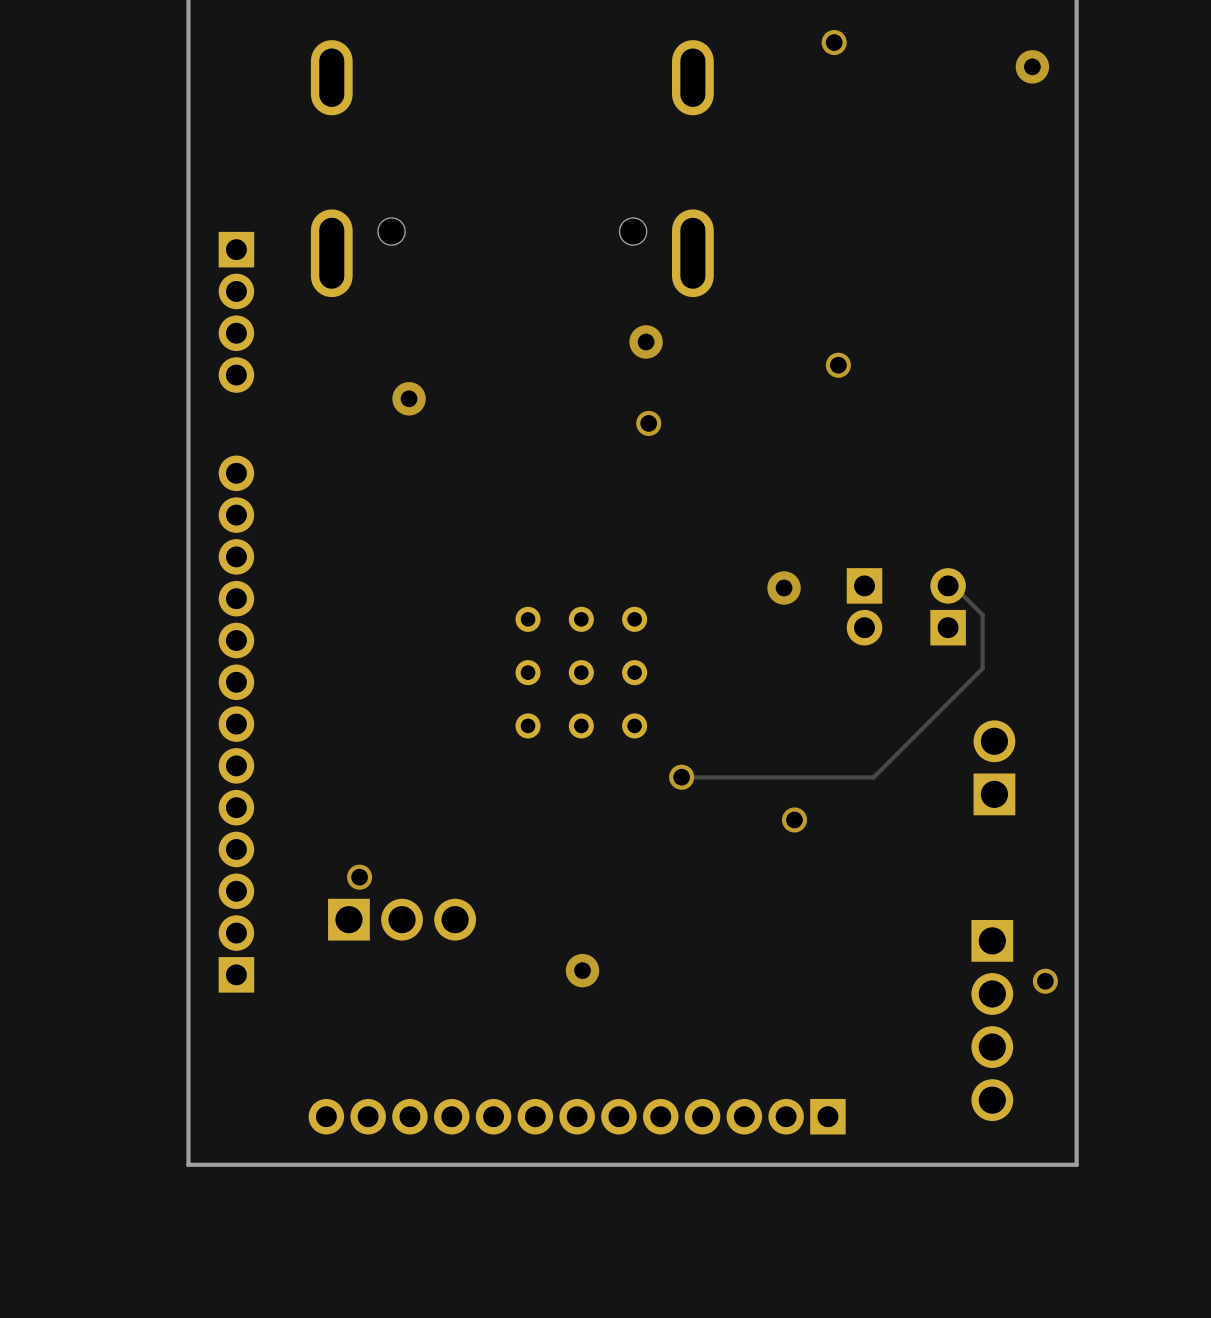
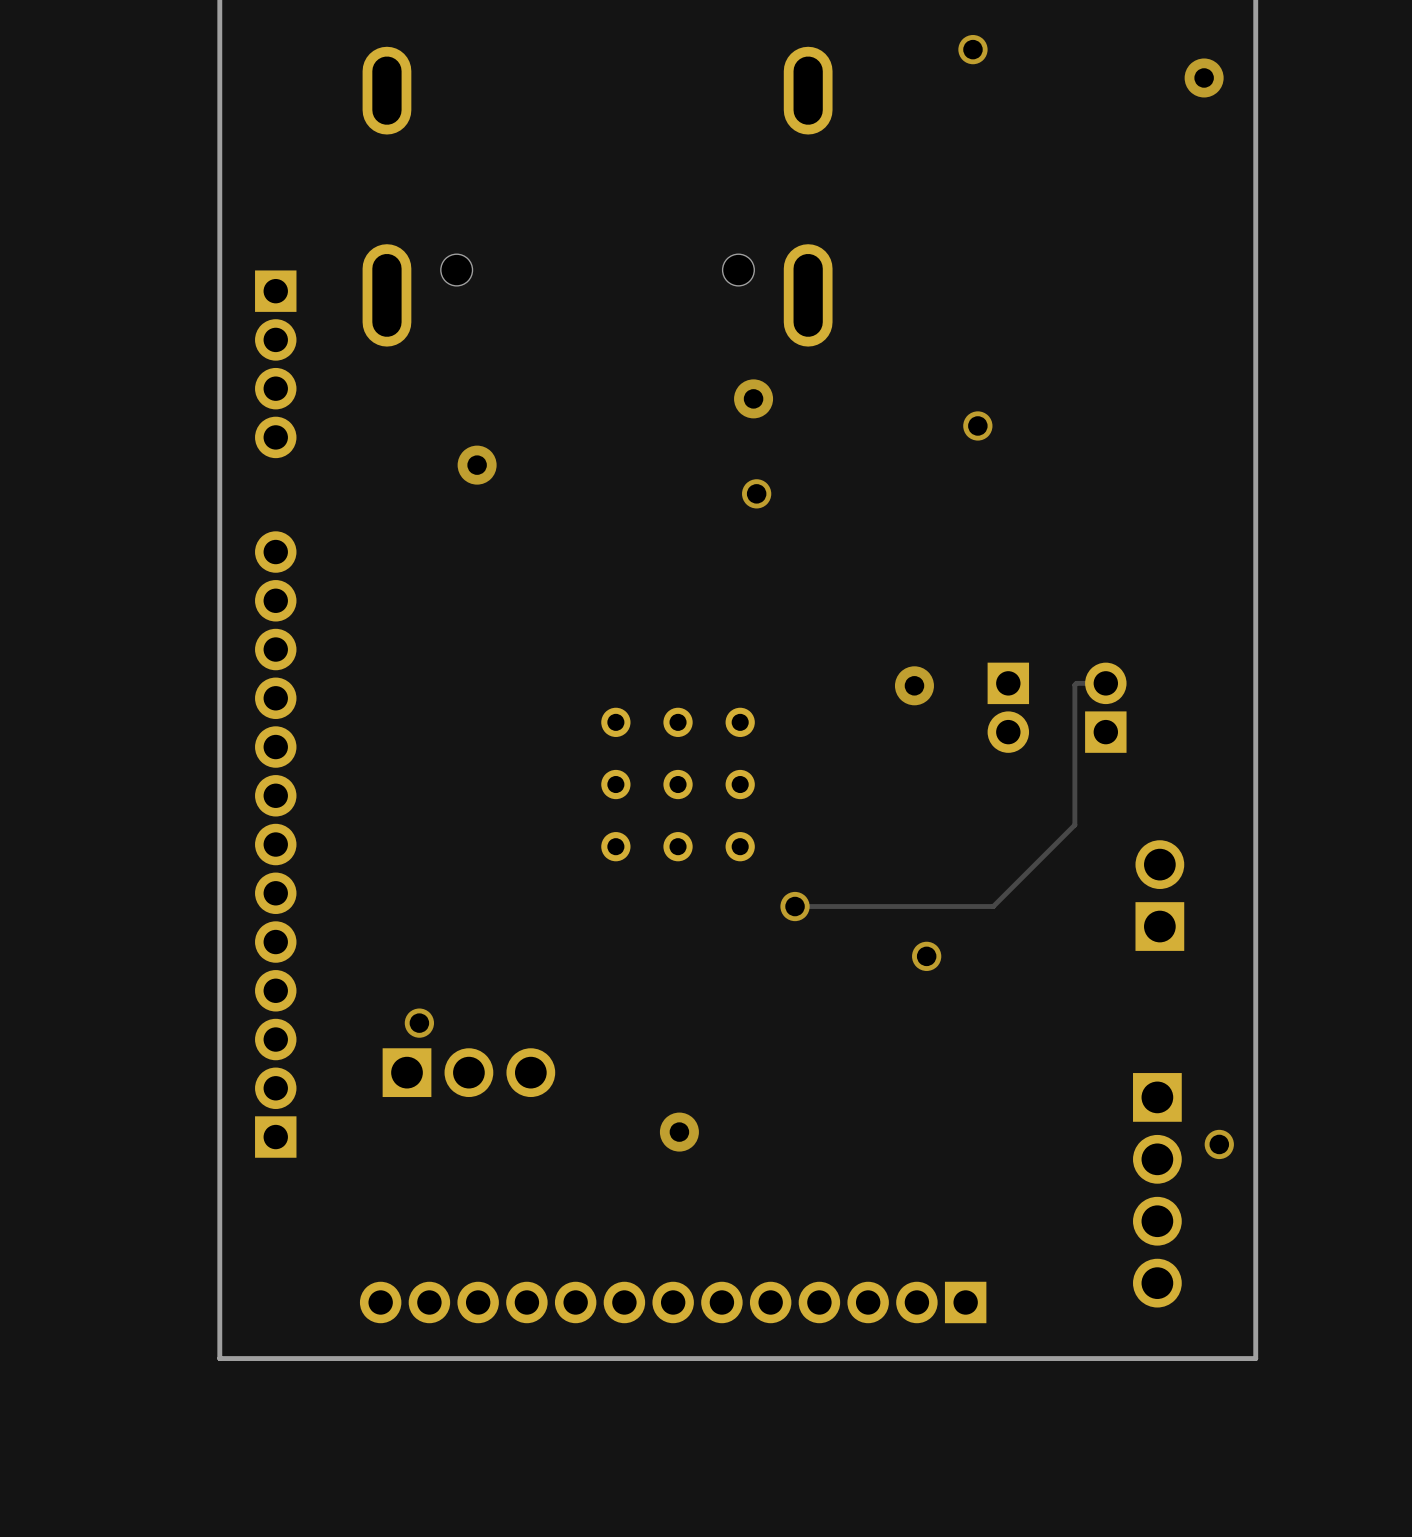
track: (948, 585) (953, 585) (982, 614) (982, 668) (873, 777) (851, 777) -> (1105, 683) (1076, 683) (1074, 685) (1074, 824) (993, 906)

